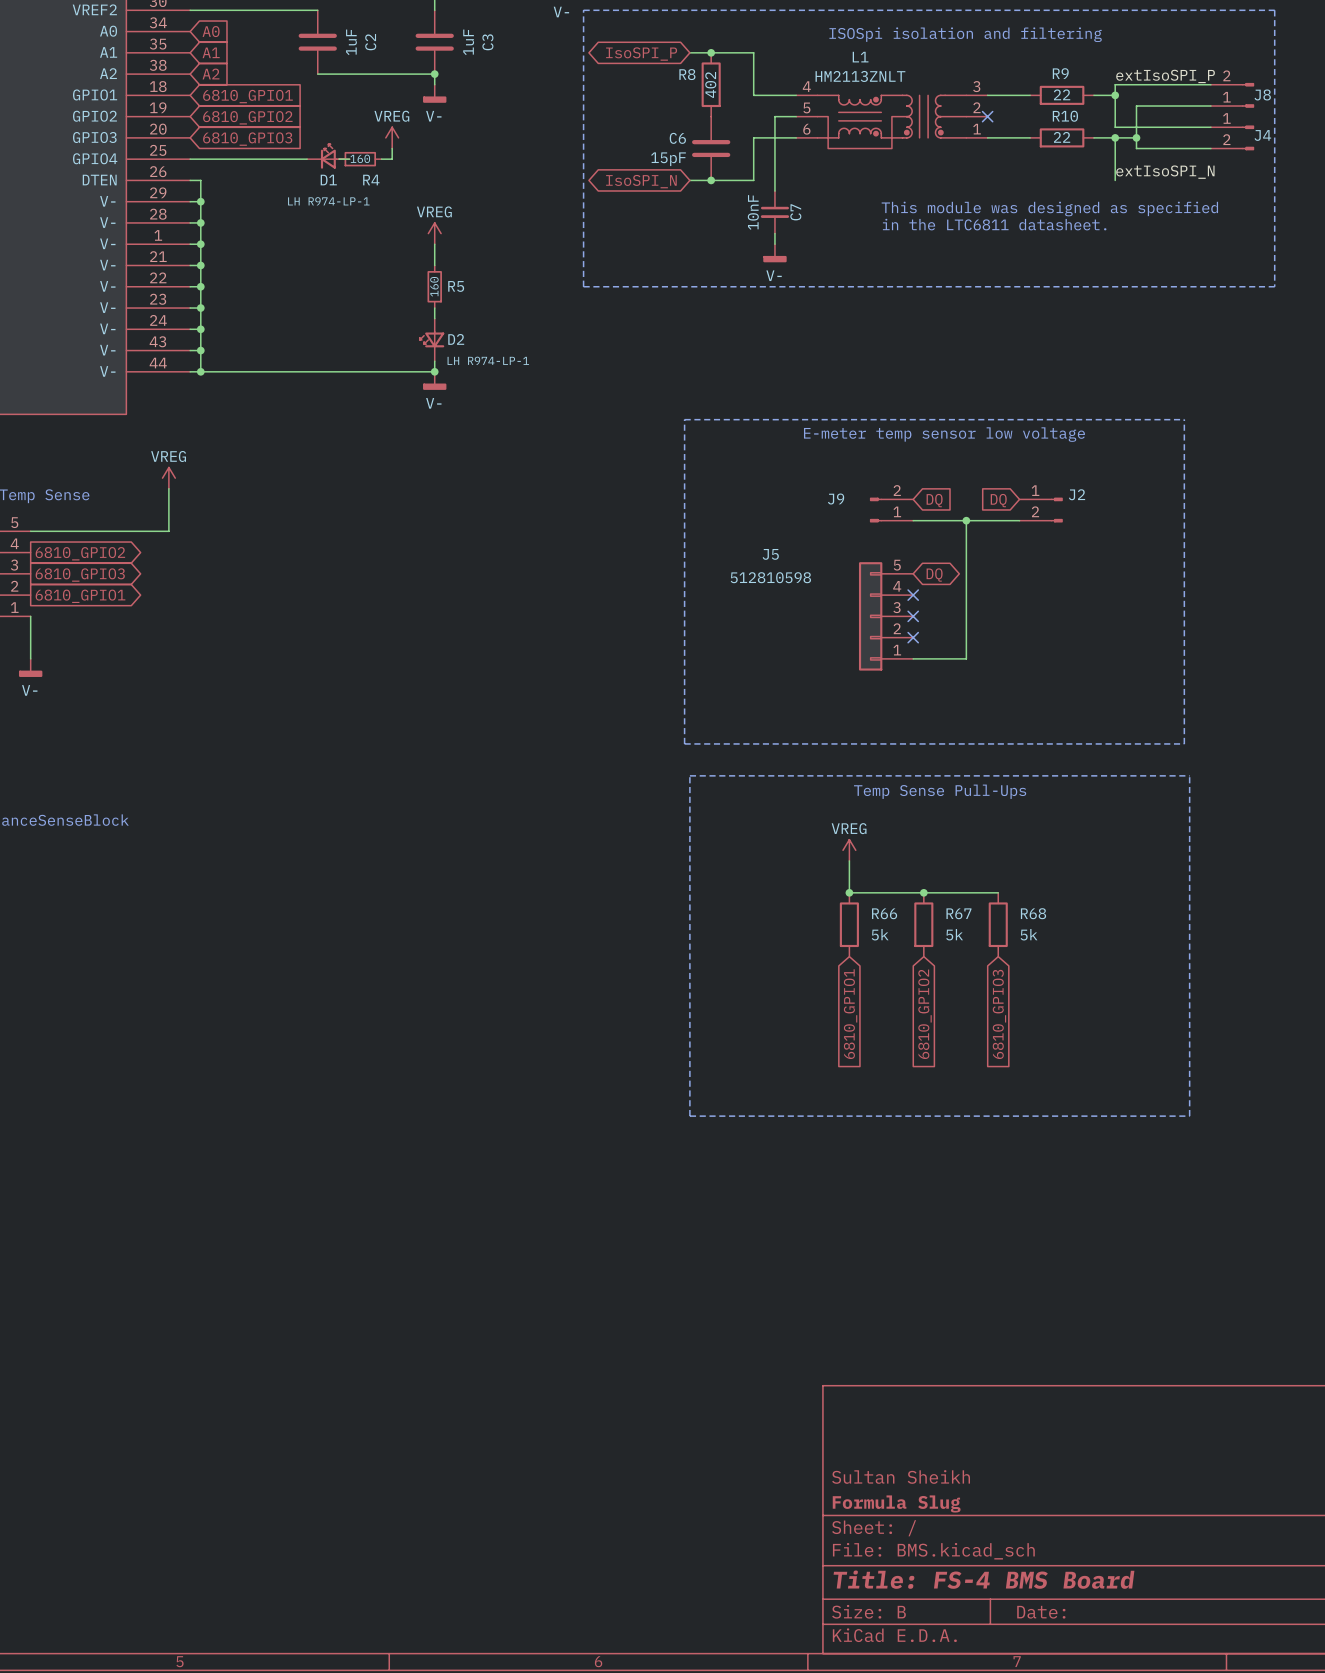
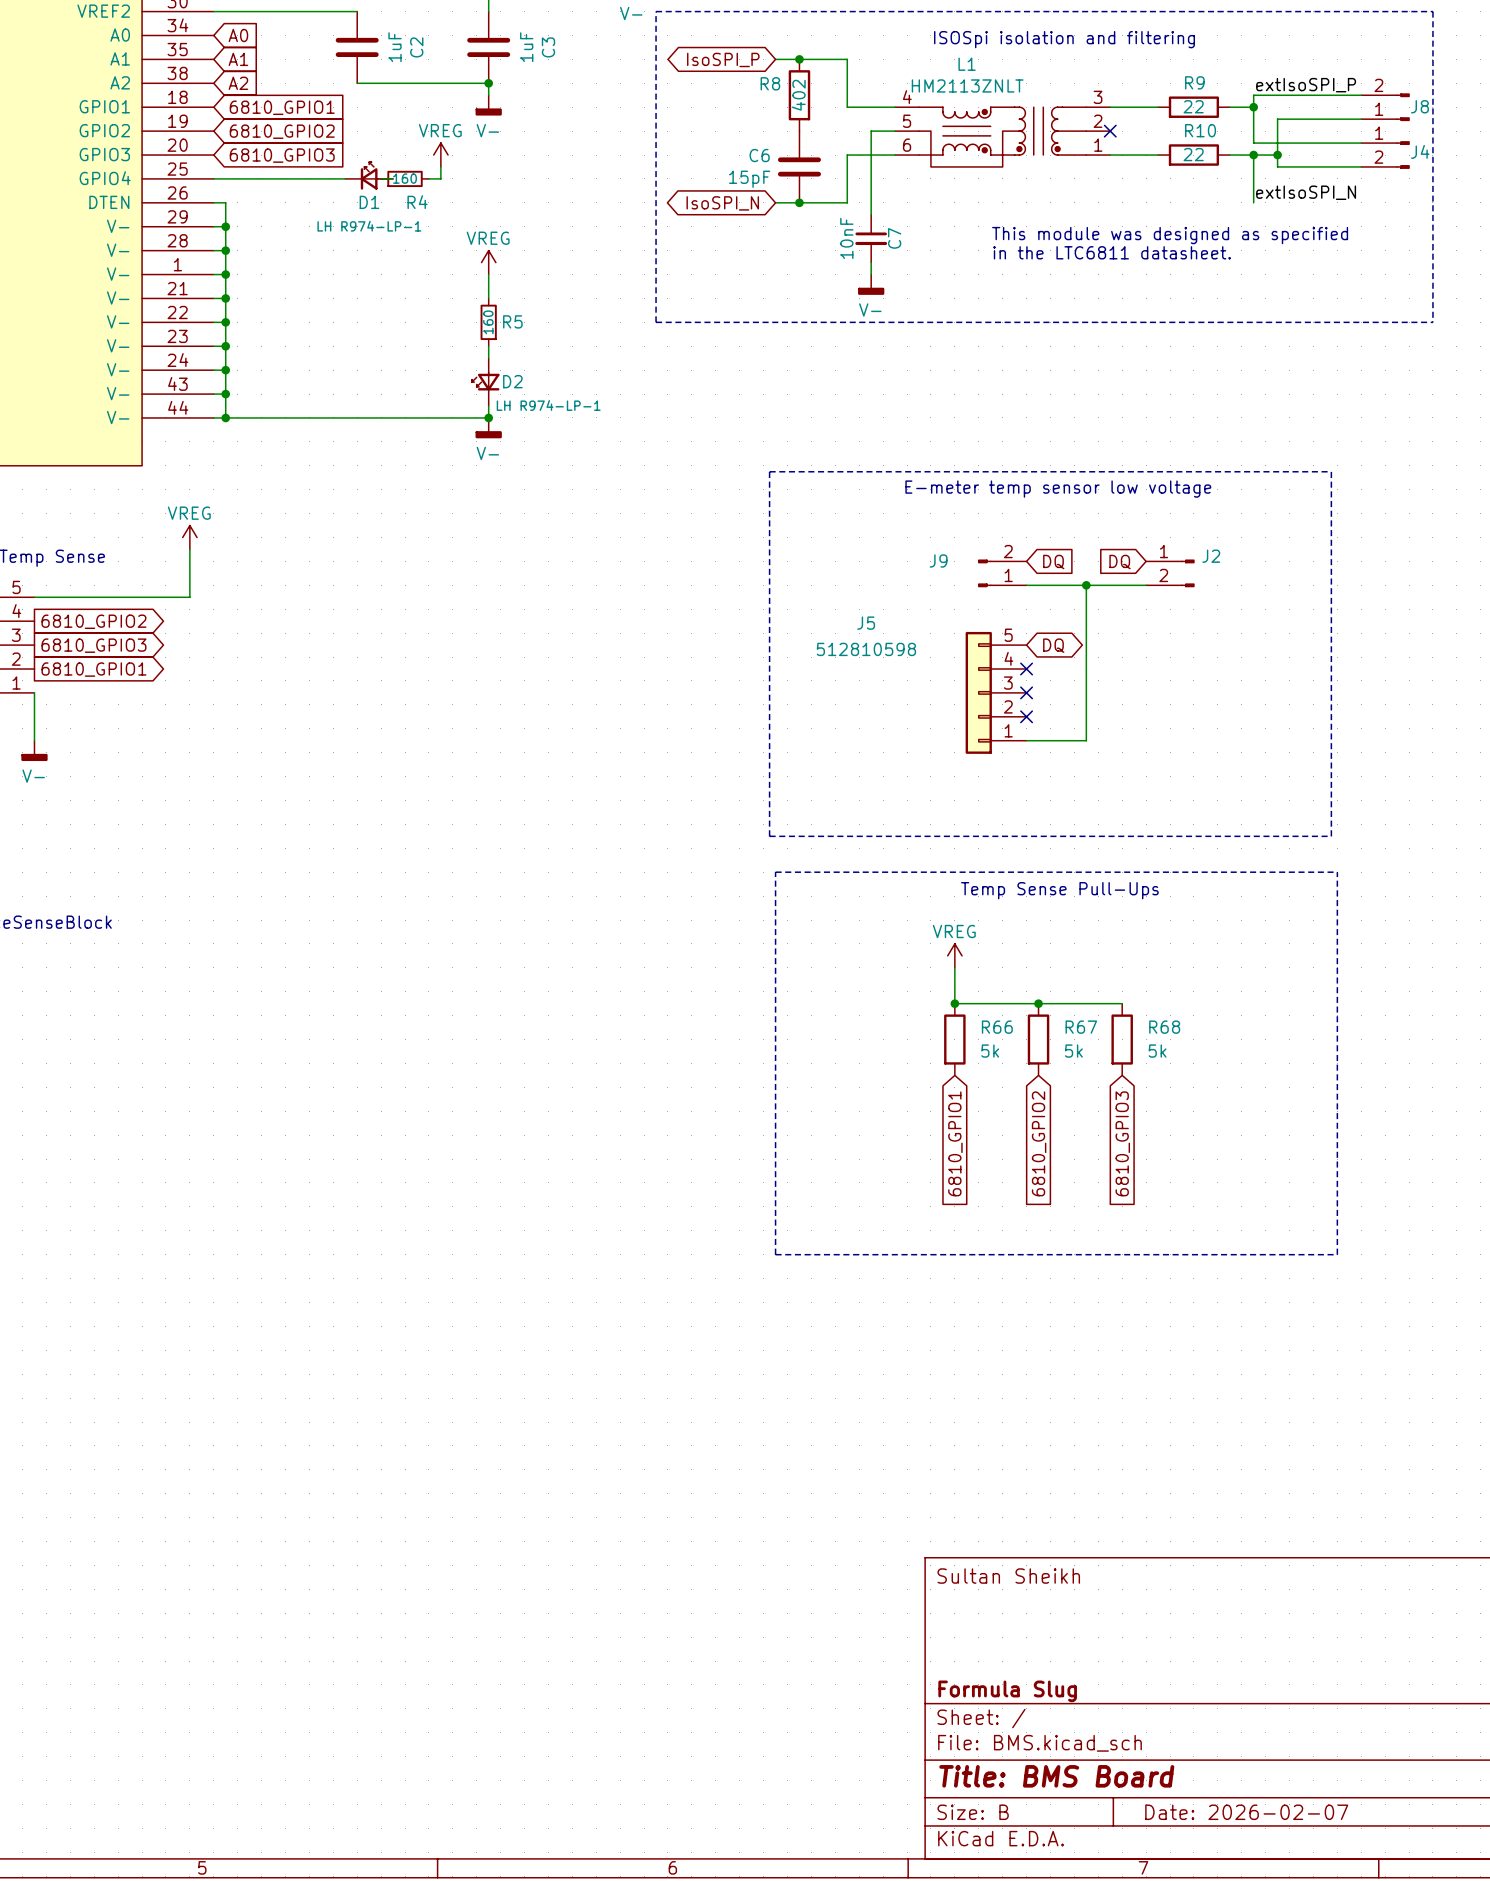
title block position: Sultan Sheikh (901, 1476) -> Sultan Sheikh (1008, 1576)
title block: Title: FS-4 BMS Board (984, 1579) -> Title: BMS Board (1056, 1776)
title block: Date: (1041, 1612) -> Date: 2026-02-07 (1246, 1812)

